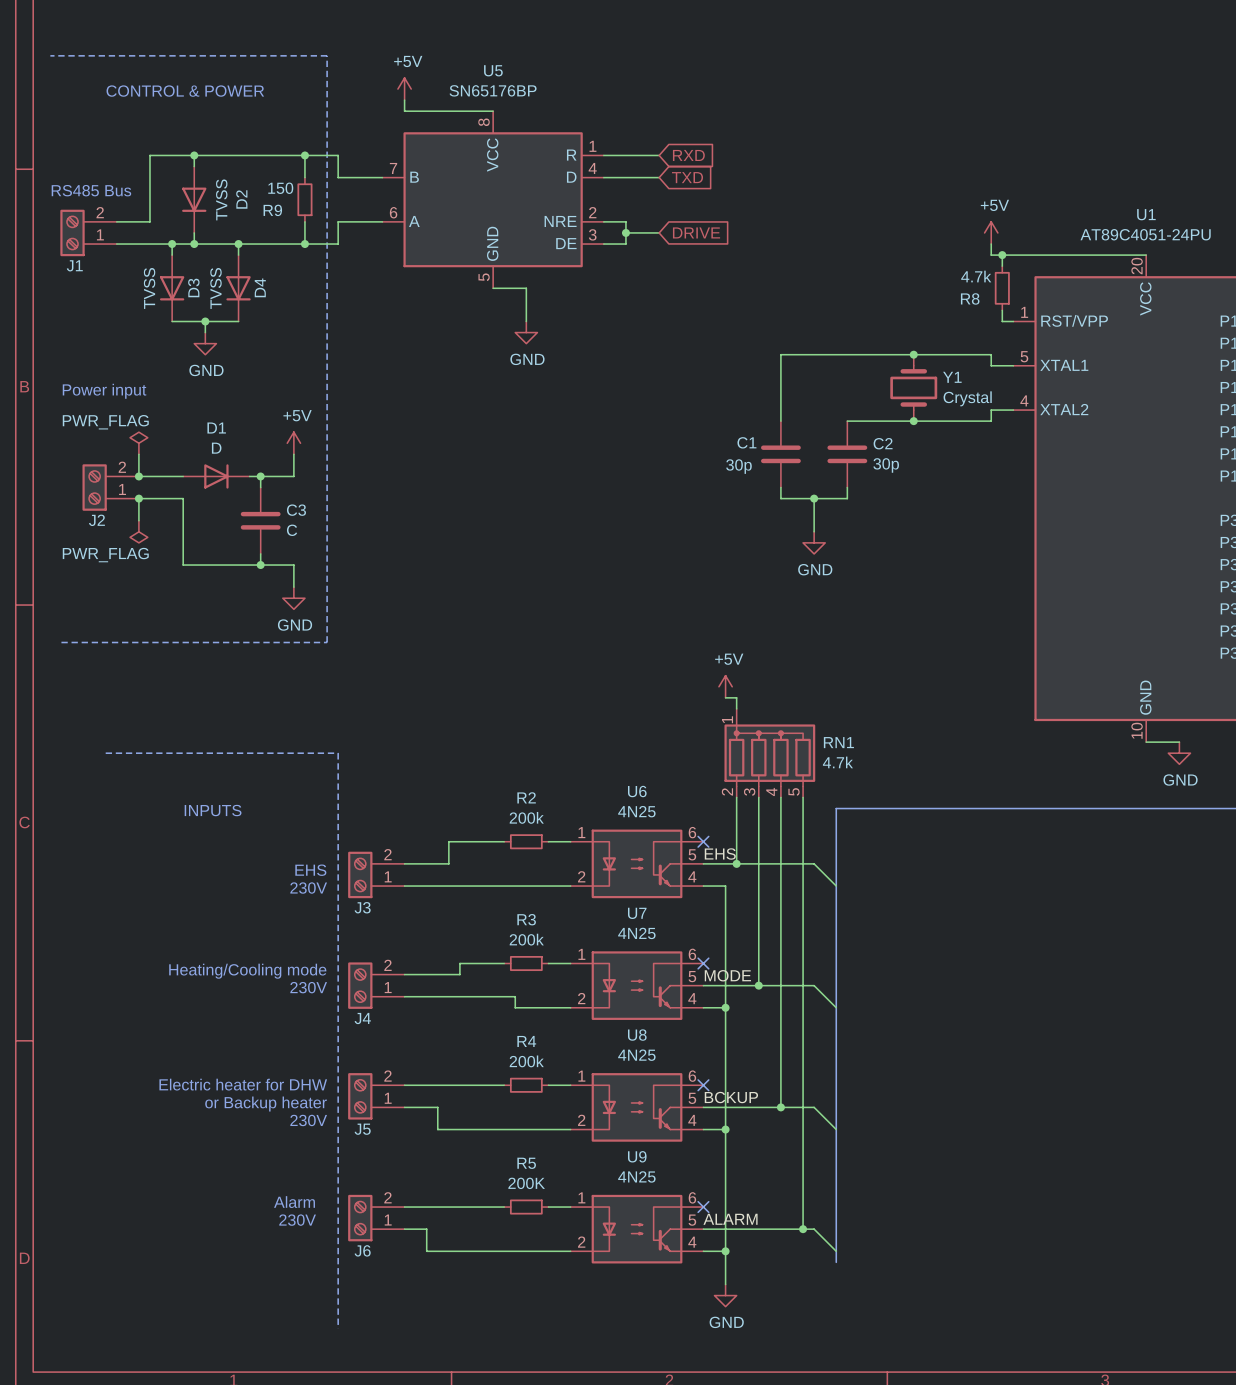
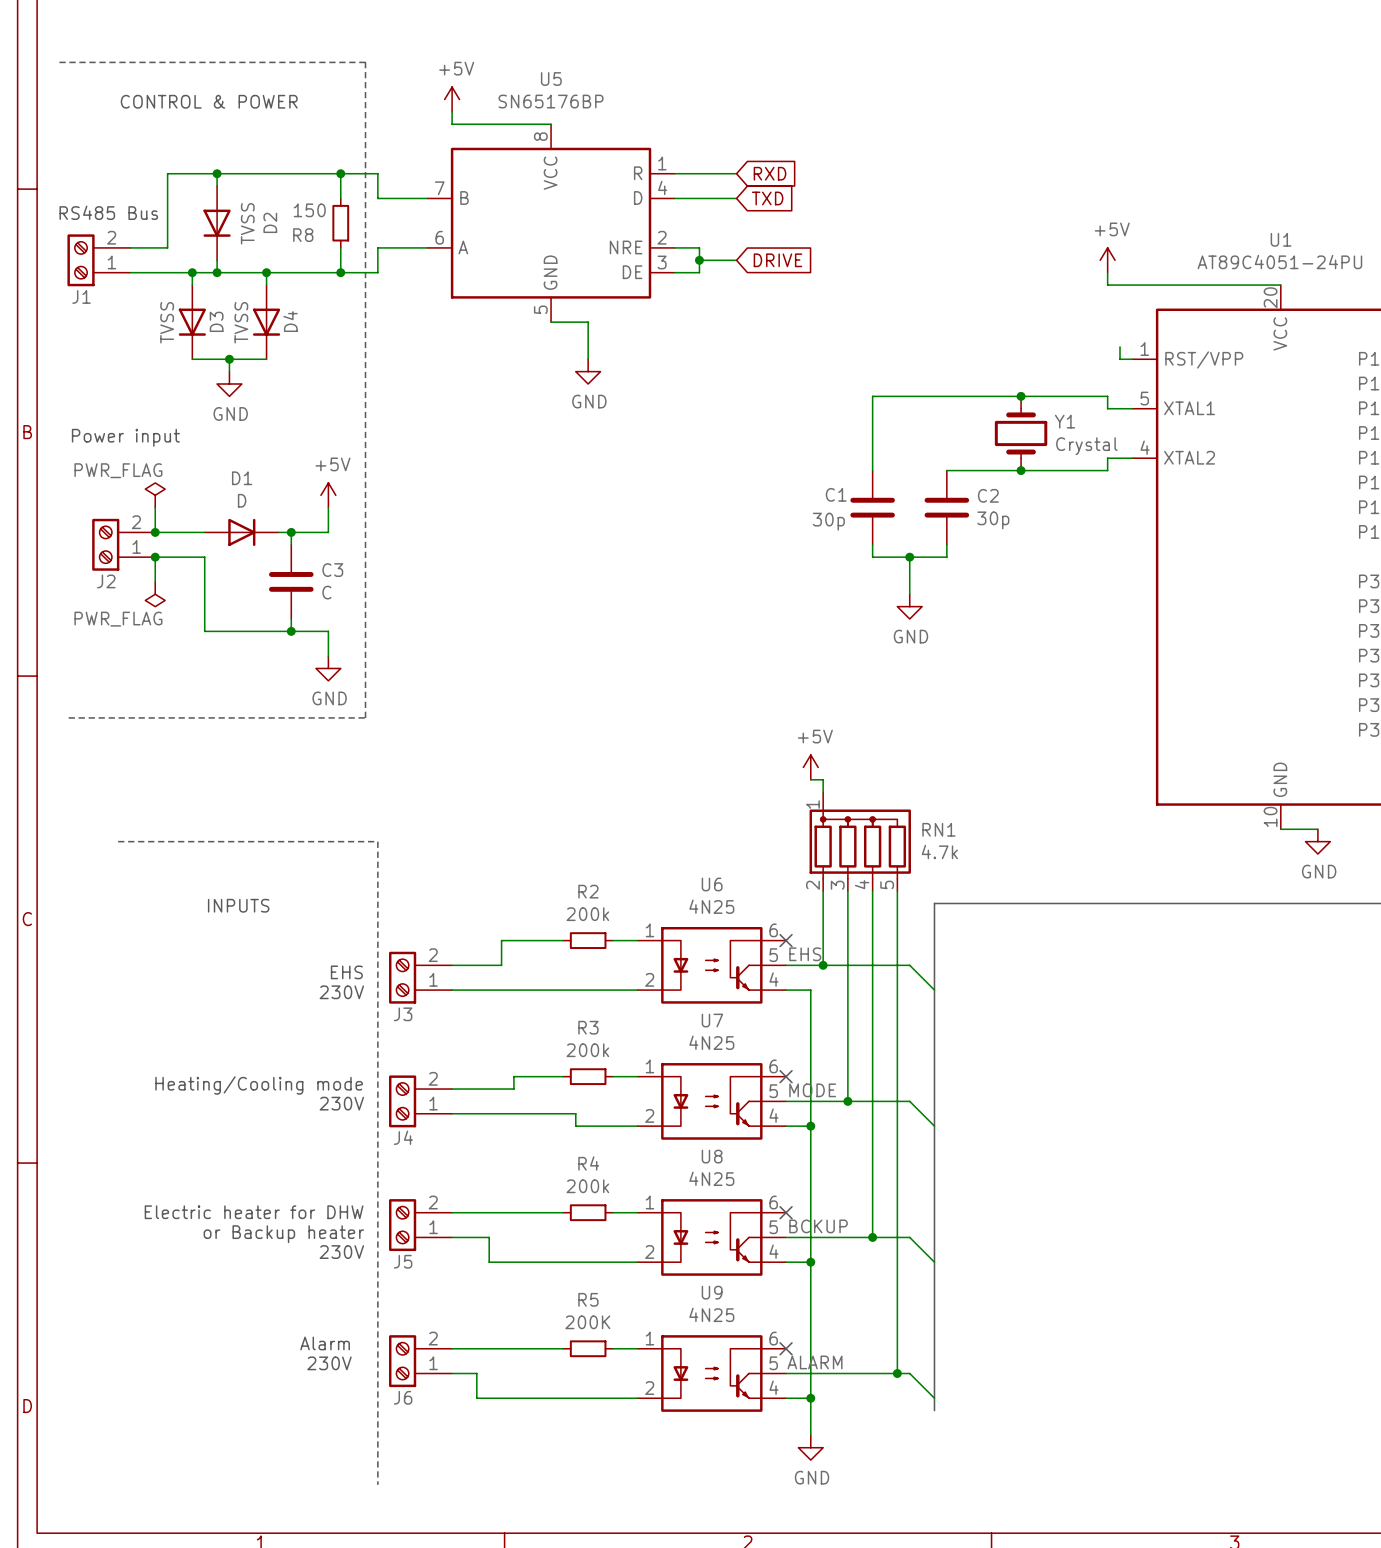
R9 name: R9 (272, 210) -> R8 (303, 235)
wire: (1002, 255) (1002, 266) -> none
junction: (1002, 255) -> none
R8: 4.7k (1002, 288) -> none

